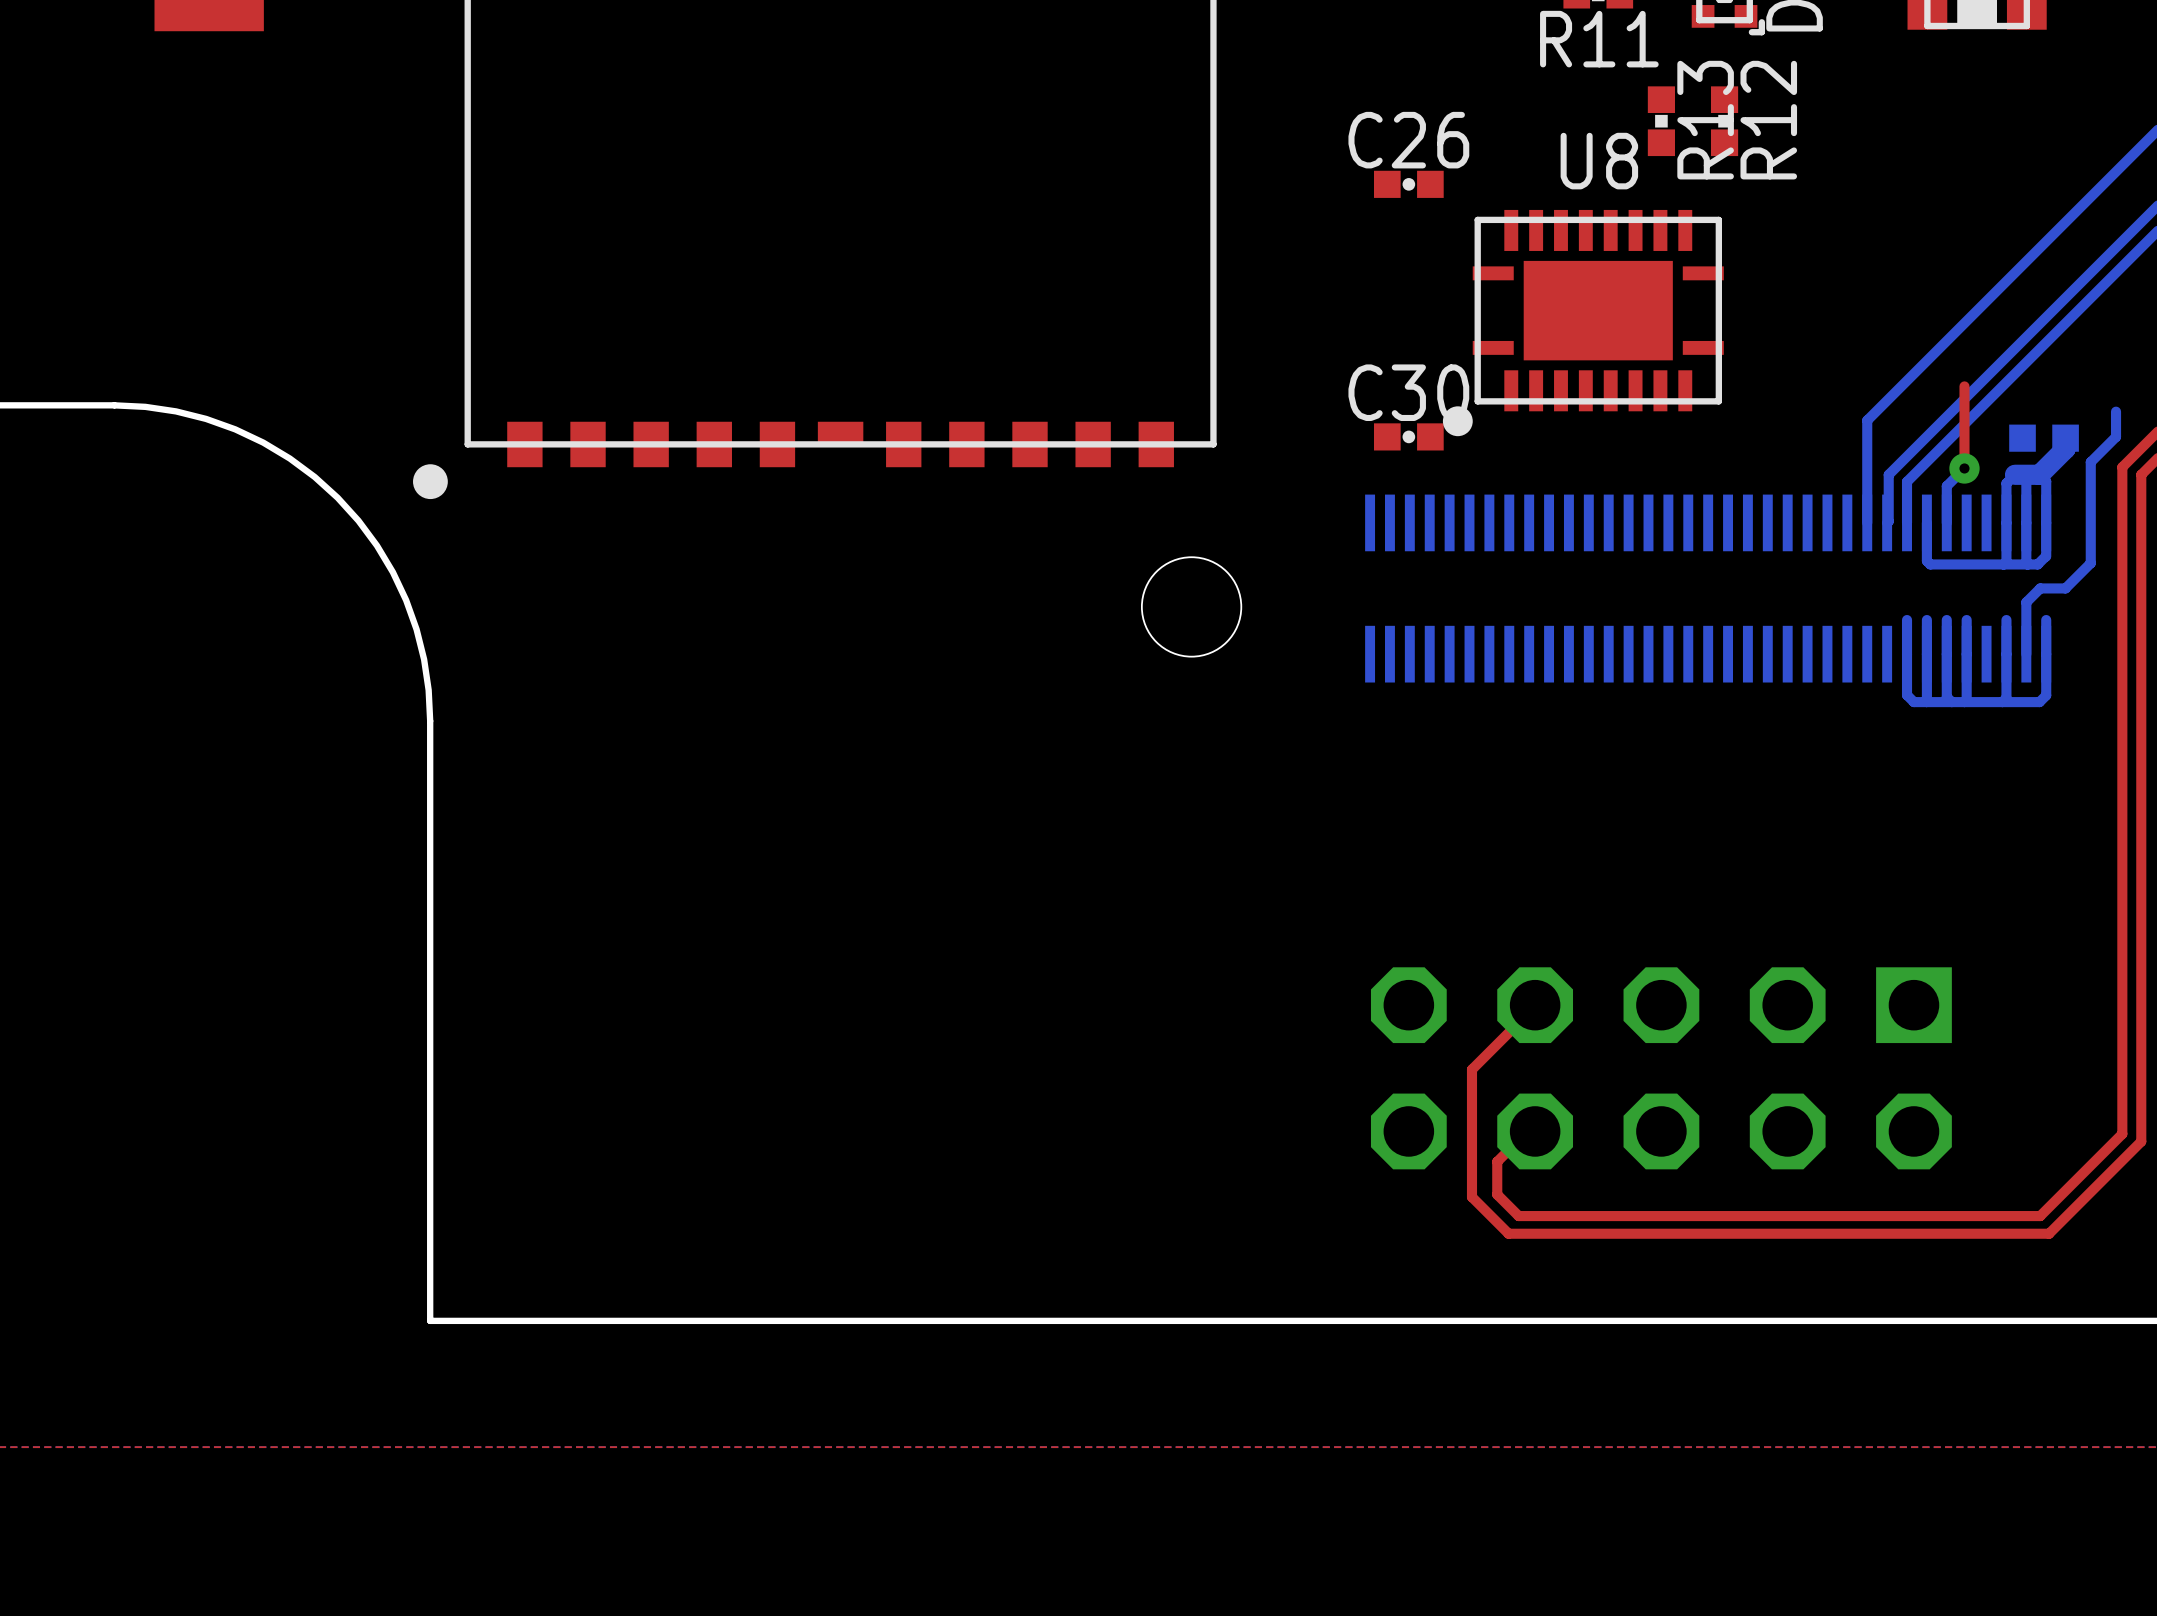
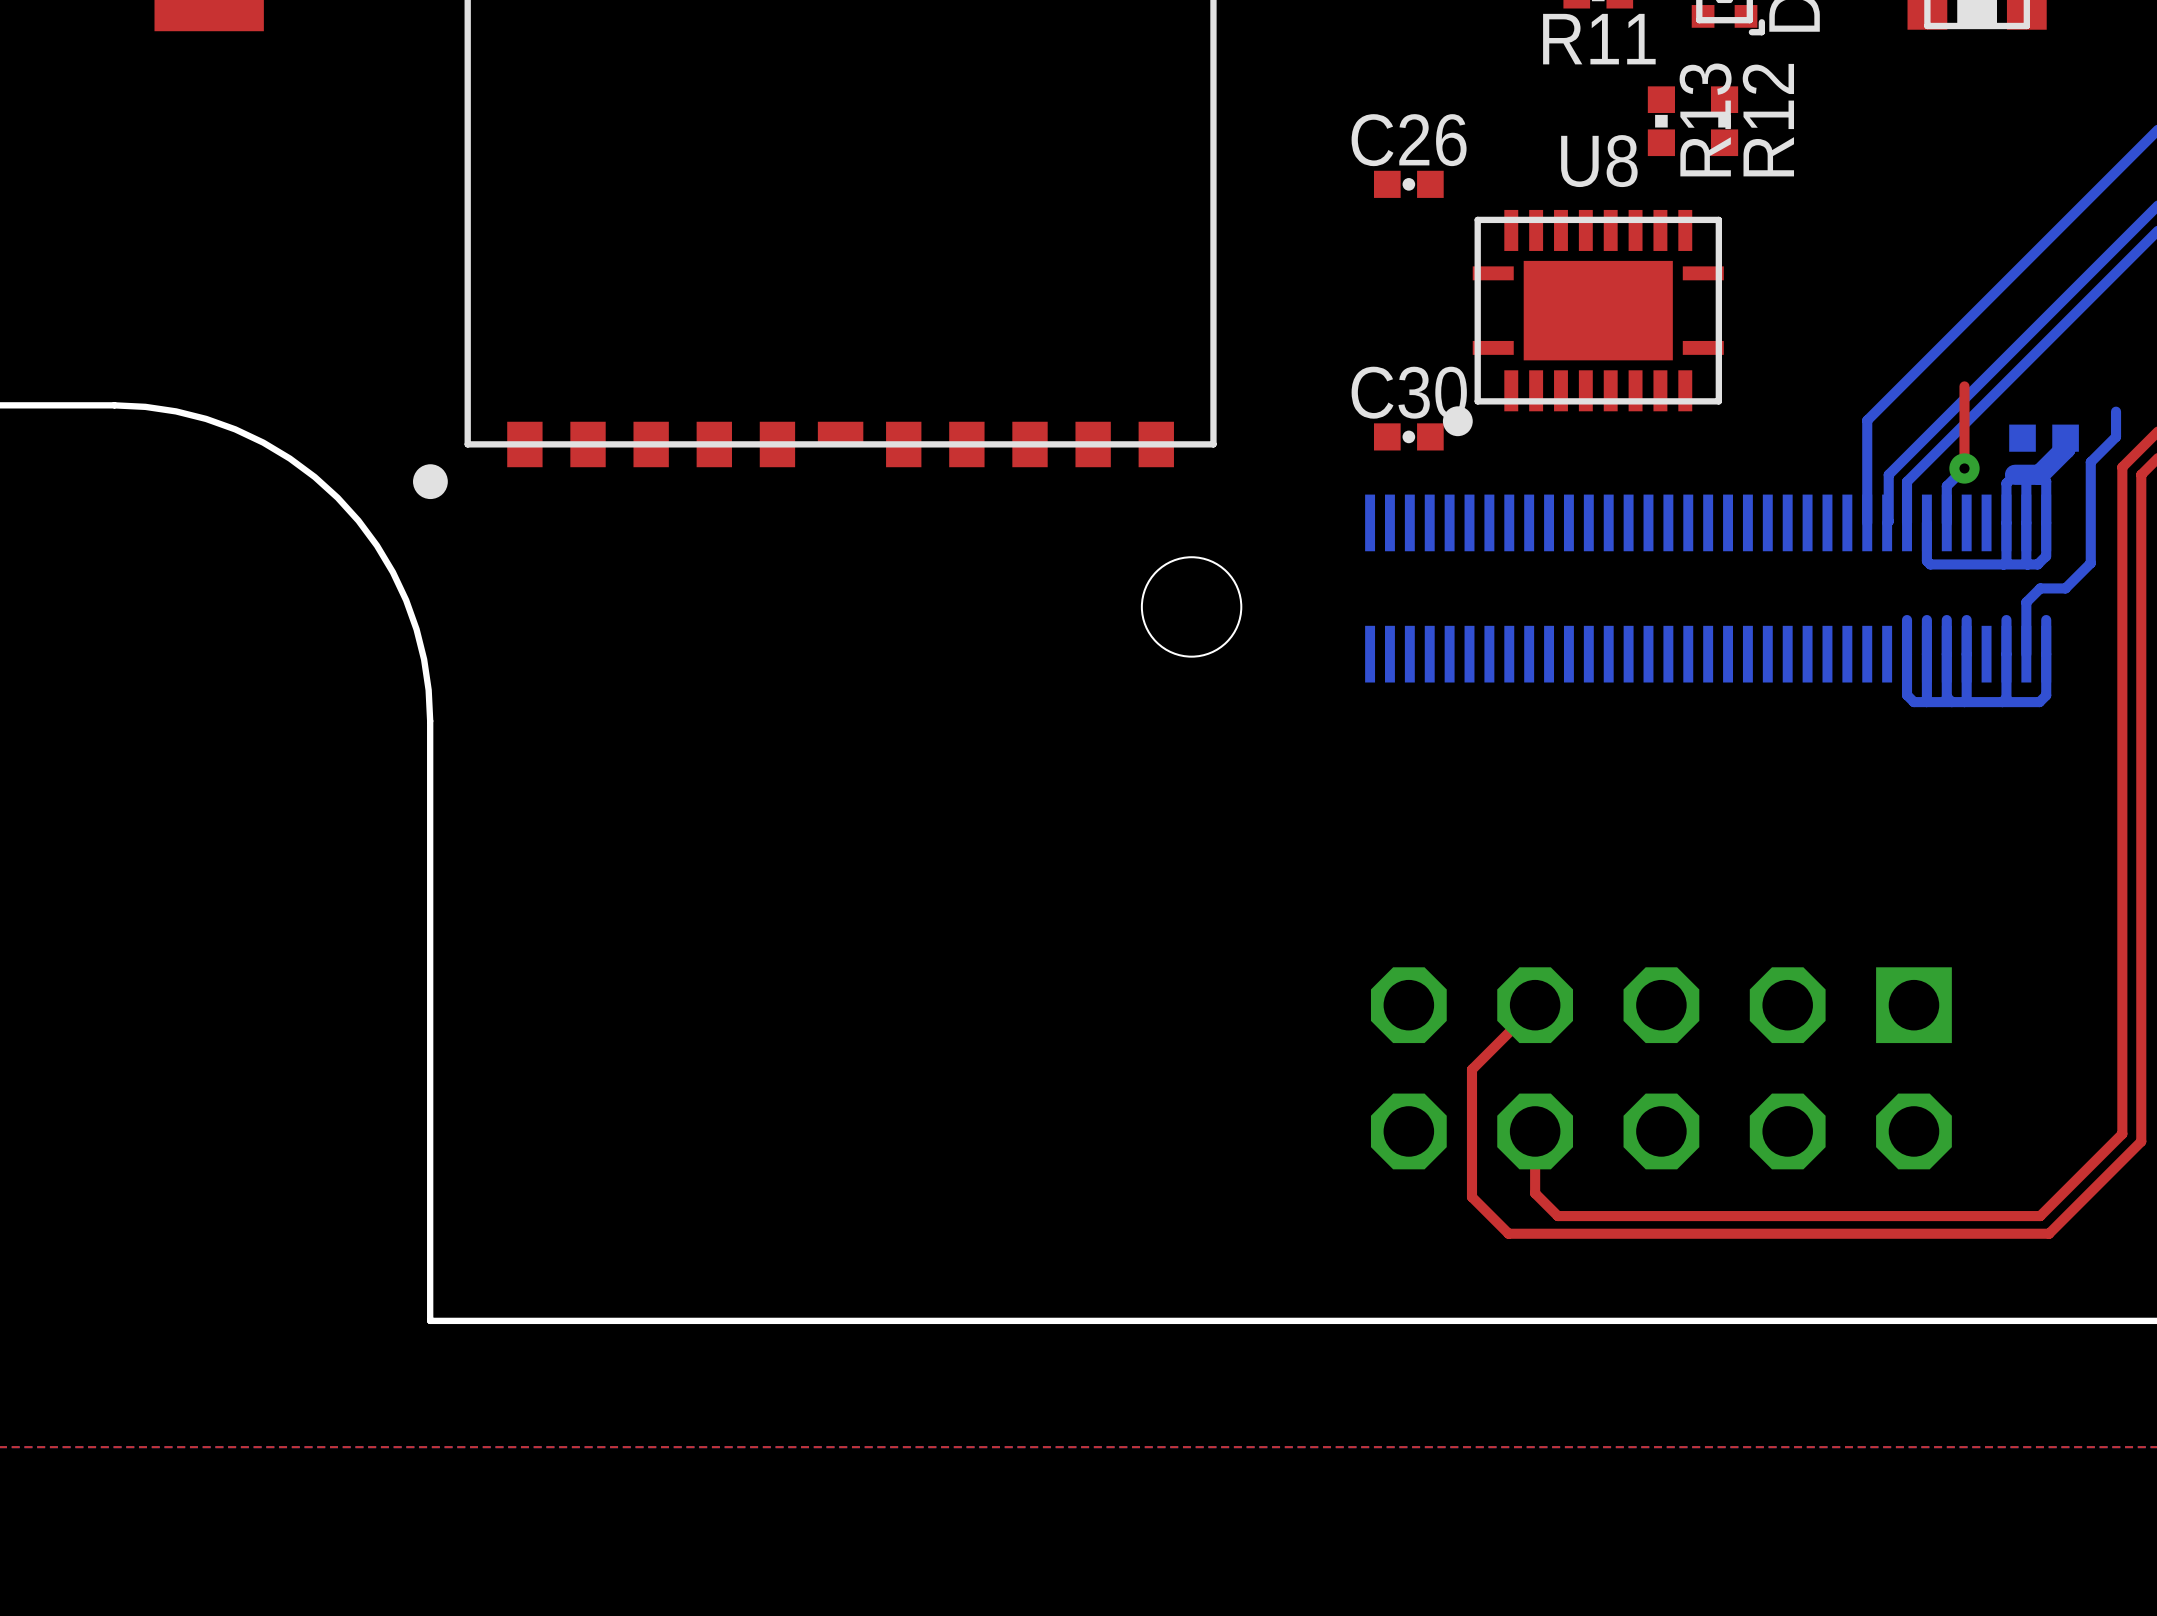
top track: (1535, 1131) (1527, 1131) (1497, 1161) (1497, 1194) (1518, 1216) (1557, 1216) -> (1535, 1131) (1535, 1193) (1557, 1216)

